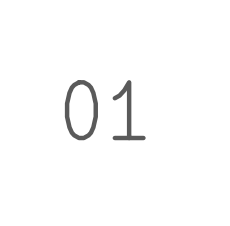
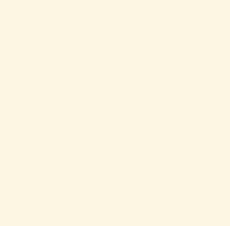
text: 01 (105, 110) -> none

